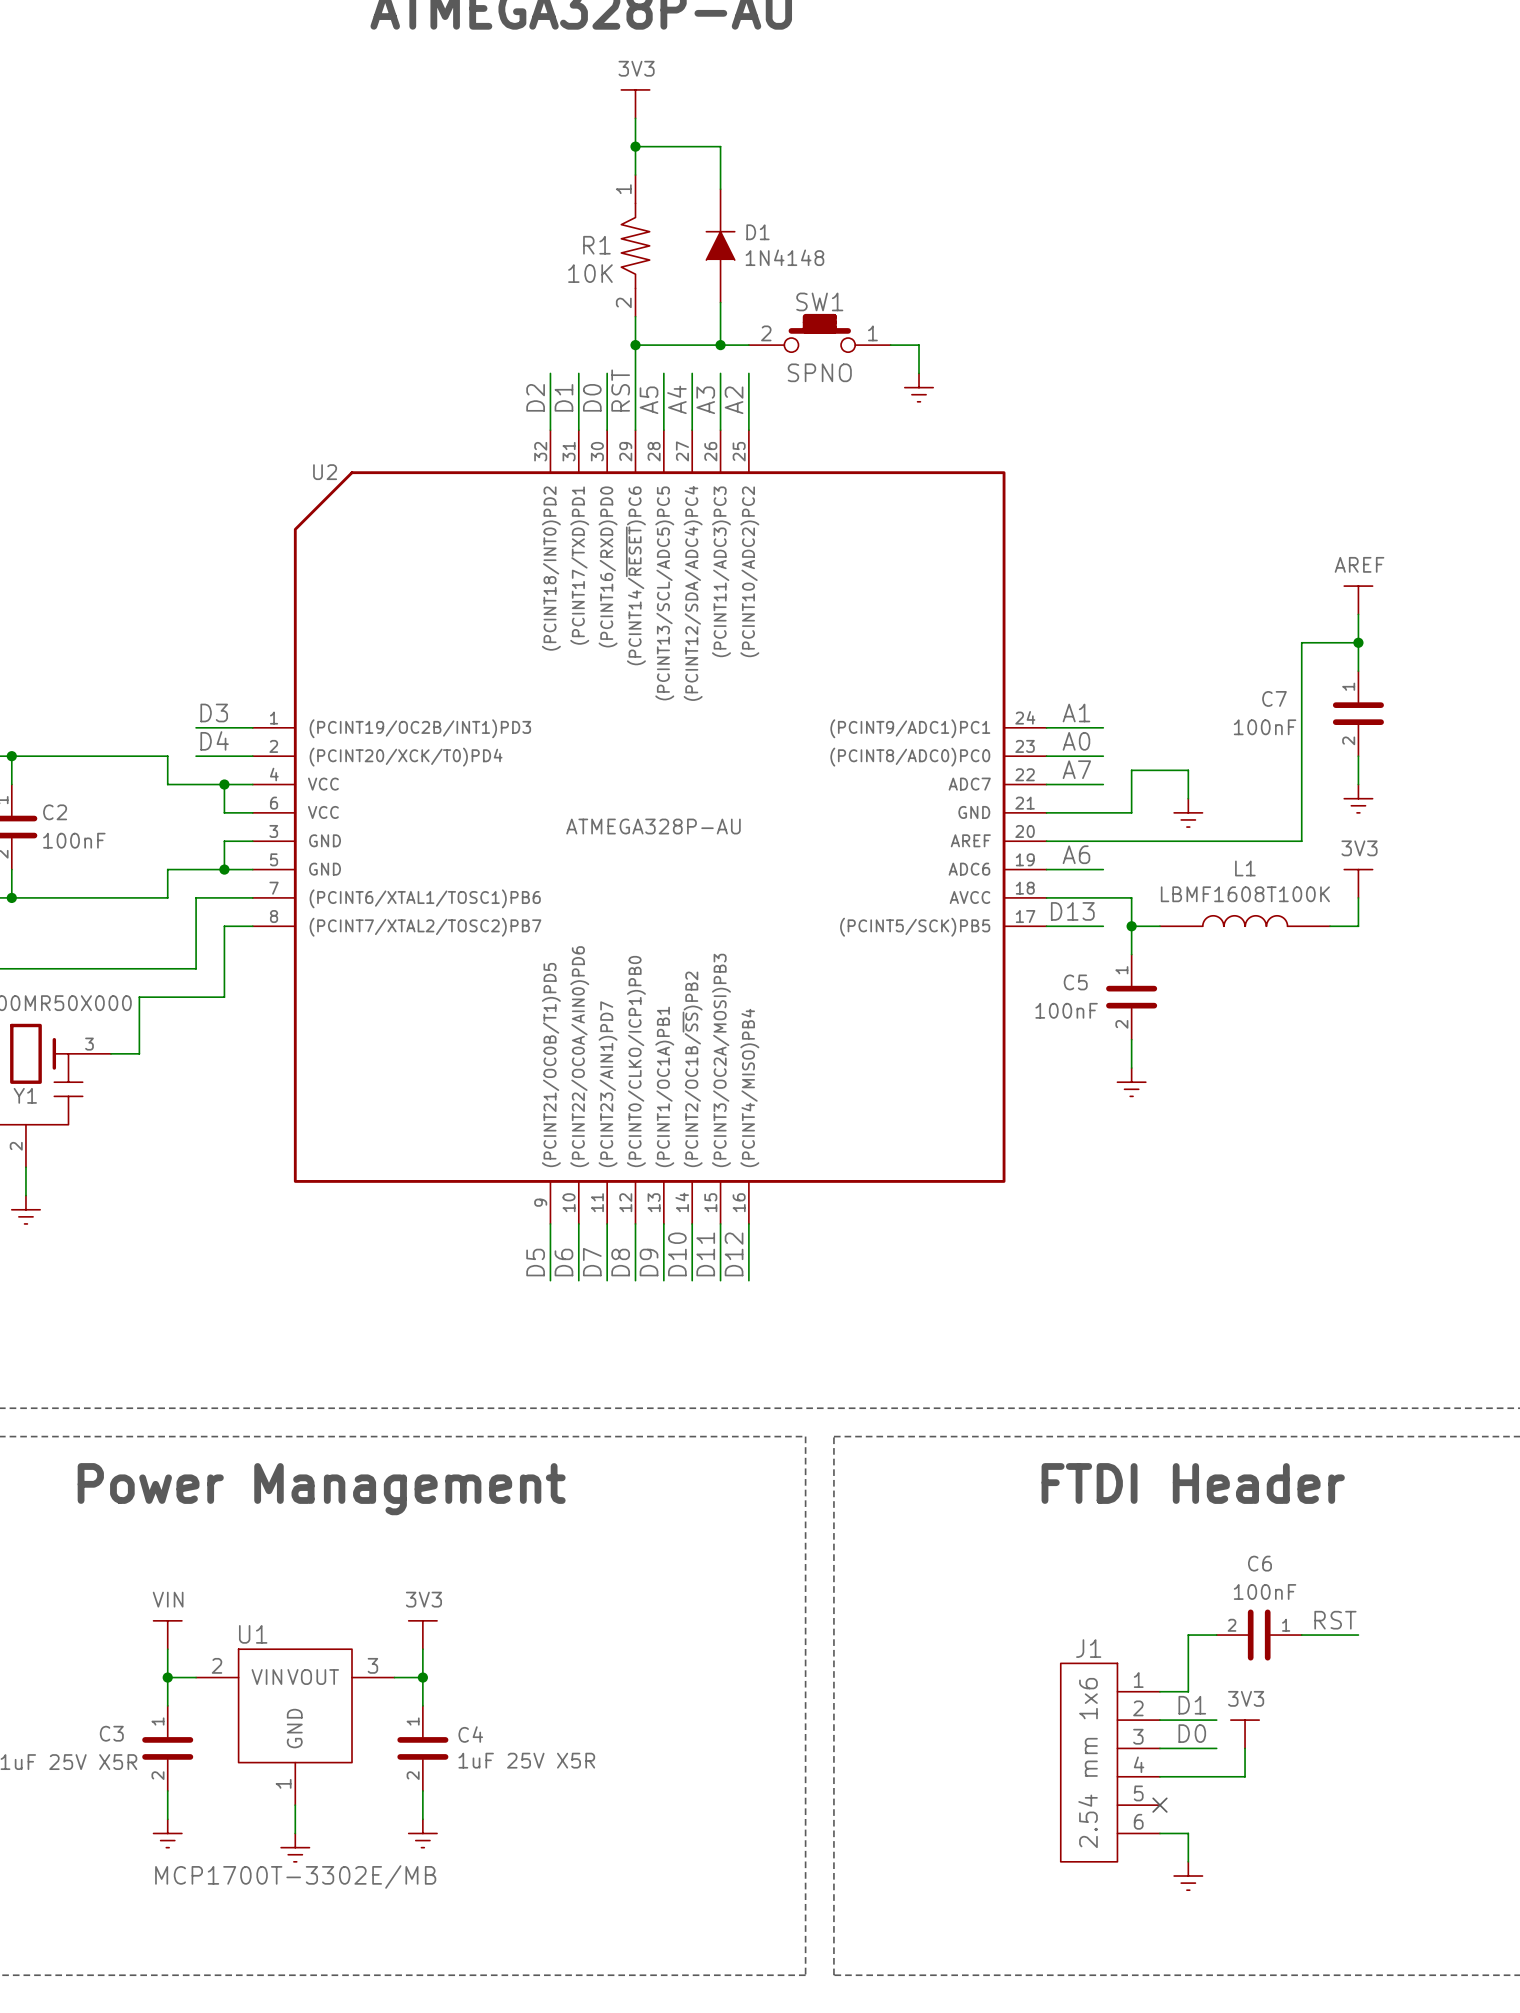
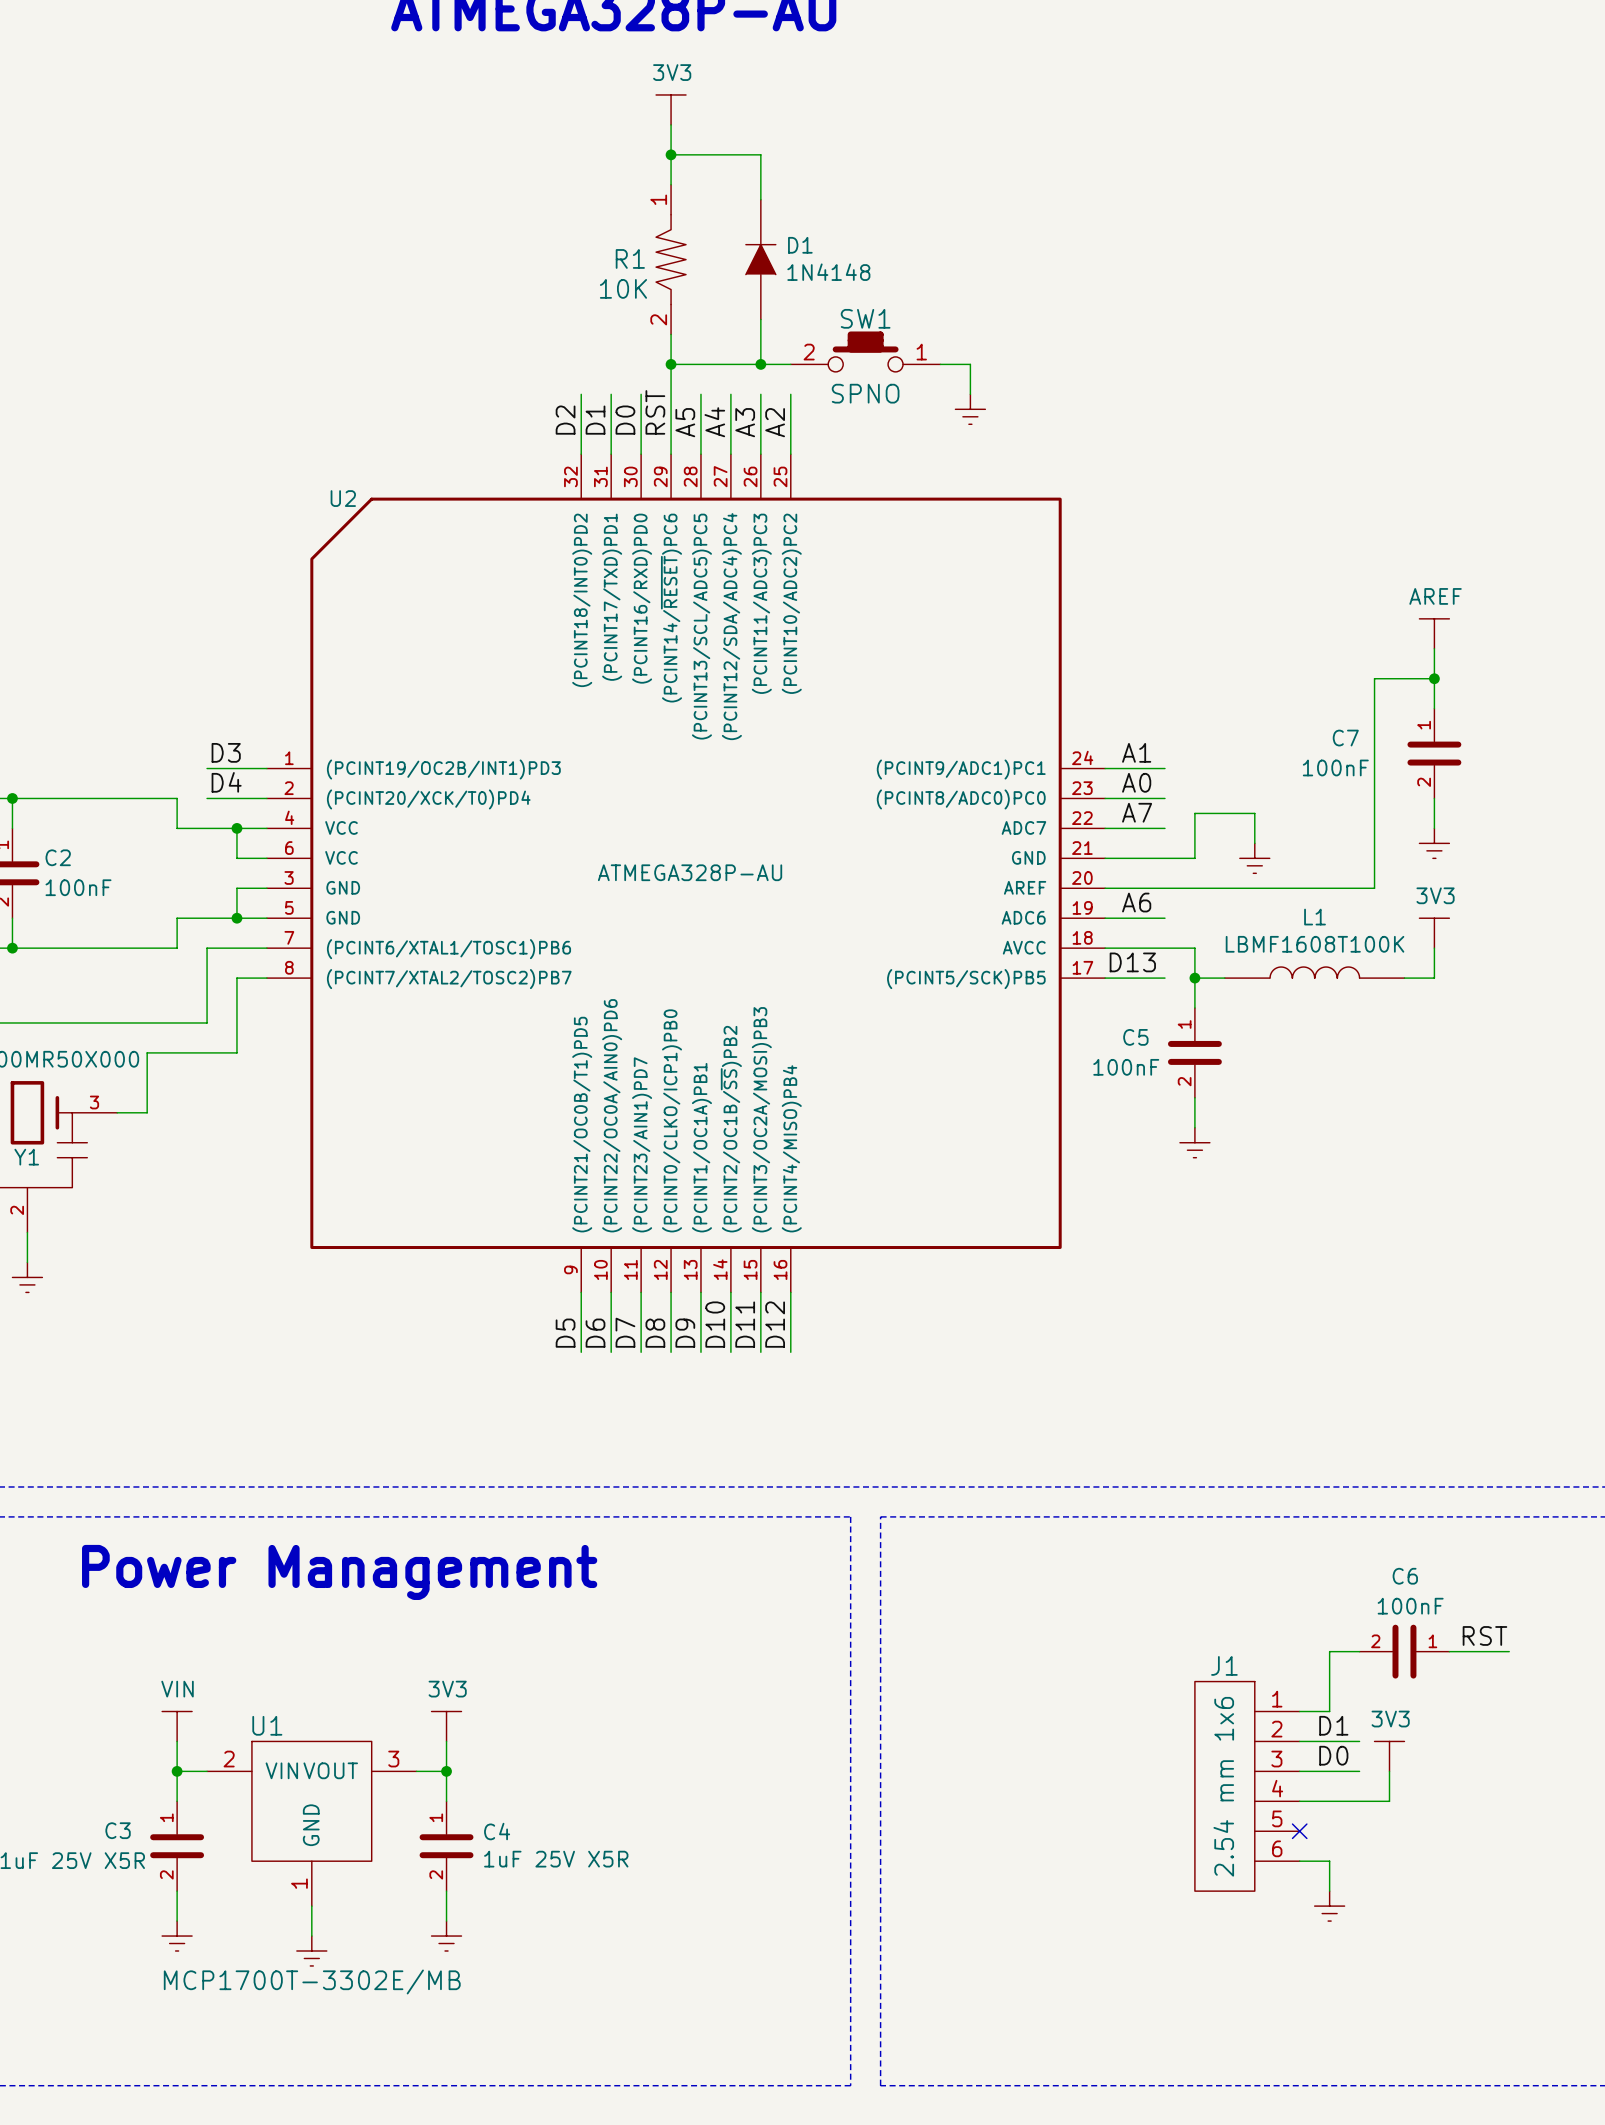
text: FTDI Header (1193, 1483) -> none
label position: RST (1335, 1620) -> RST (1484, 1635)
wire: (1216, 1635) (1188, 1635) (1188, 1691) (1159, 1691) -> (1359, 1651) (1329, 1651) (1329, 1711) (1299, 1711)
C6 position: (1259, 1635) -> (1404, 1651)
wire: (1301, 1635) (1358, 1635) -> (1449, 1651) (1509, 1651)
label position: D1 (1192, 1705) -> D1 (1333, 1725)
wire: (1159, 1720) (1216, 1720) -> (1299, 1741) (1359, 1741)
label position: D0 (1192, 1733) -> D0 (1333, 1755)
no-connect mark: none -> (1299, 1831)
power symbol position: 3V3 (1245, 1734) -> 3V3 (1389, 1756)
wire: (1159, 1748) (1216, 1748) -> (1299, 1771) (1359, 1771)
wire: (1245, 1748) (1245, 1776) (1159, 1776) -> (1389, 1771) (1389, 1801) (1299, 1801)
J1 position: (1110, 1762) -> (1247, 1786)
no-connect mark: (1159, 1805) -> none
wire: (1159, 1833) (1188, 1833) (1188, 1861) -> (1299, 1861) (1329, 1861) (1329, 1891)
power symbol position: (1188, 1876) -> (1329, 1906)

